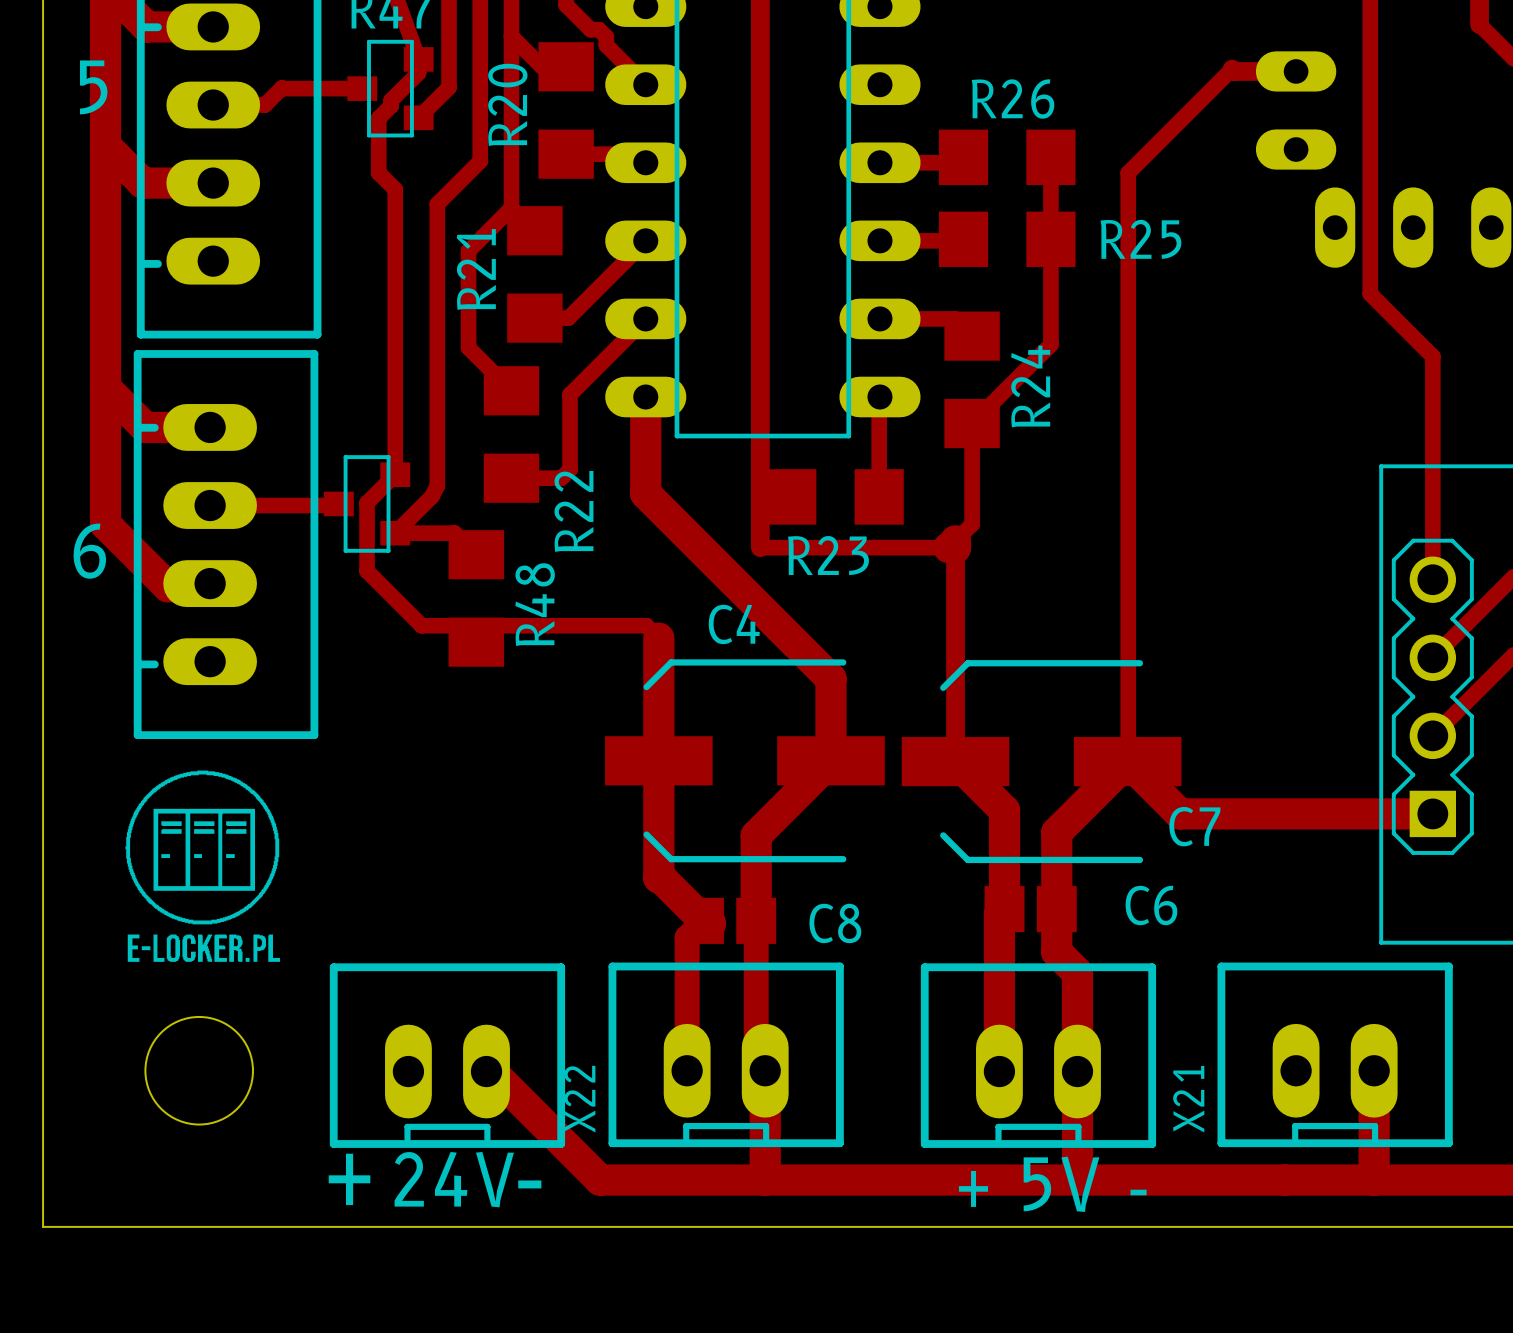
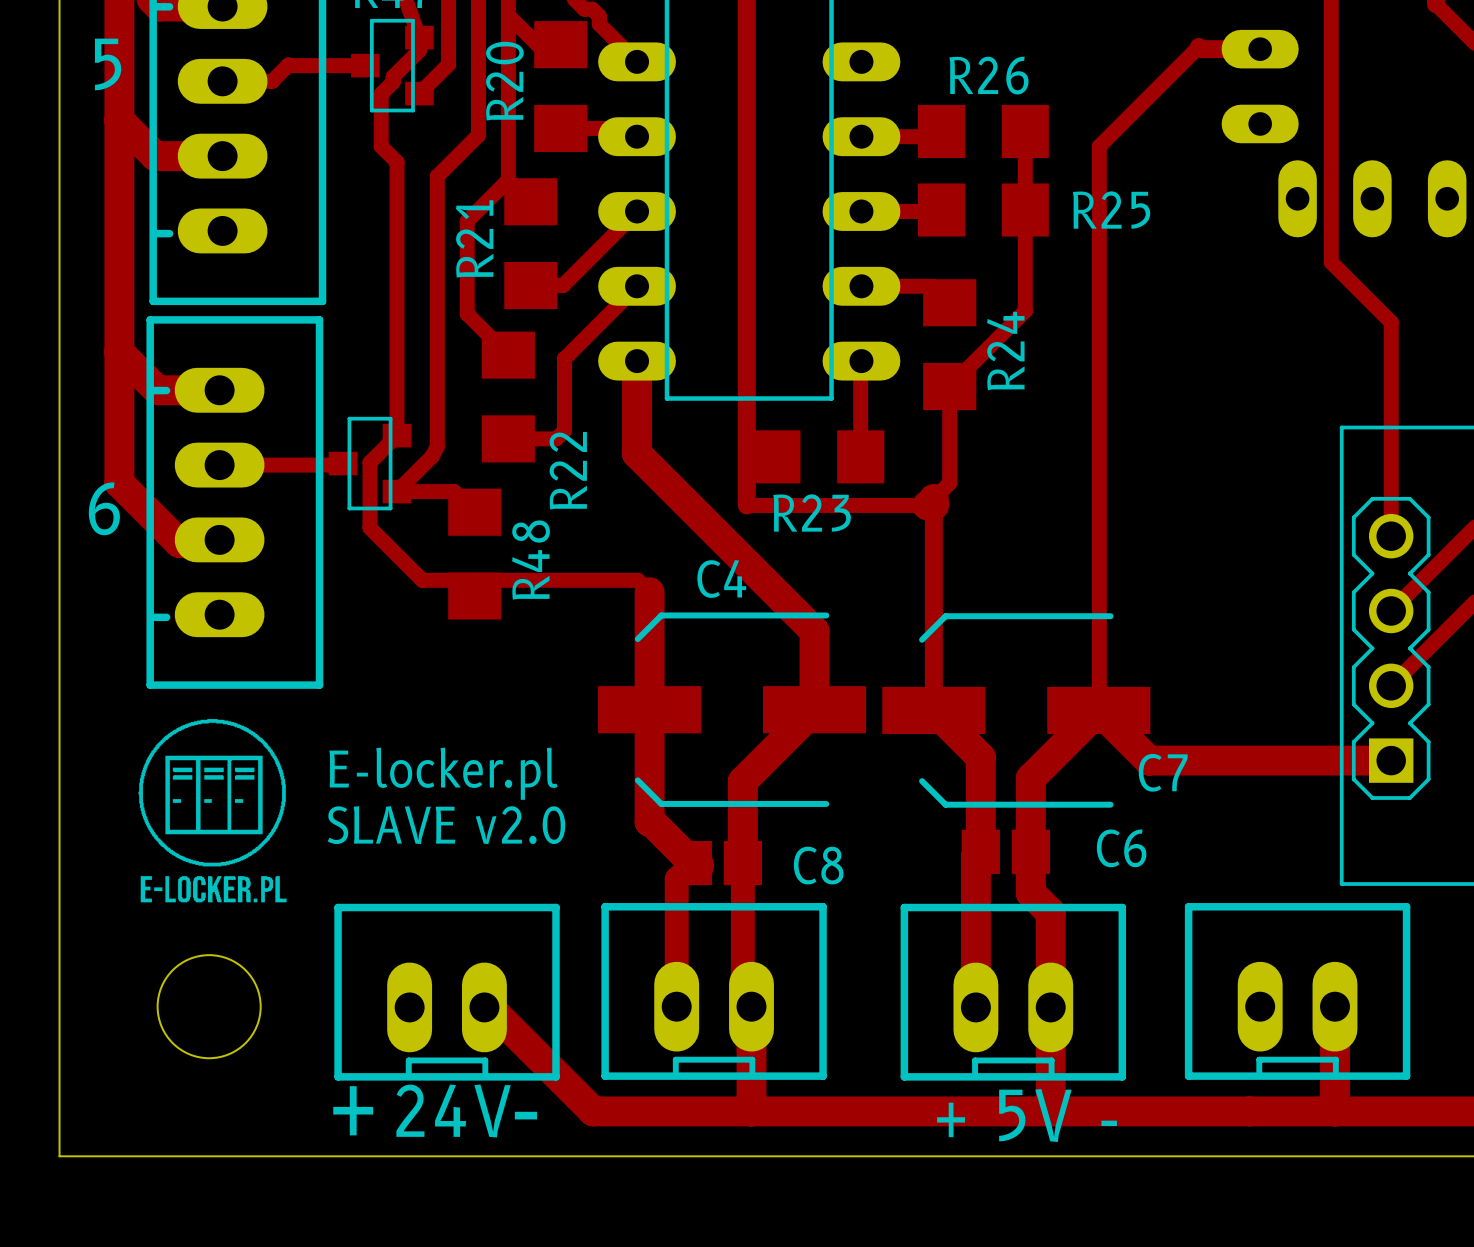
text: none -> E-locker.pl (443, 773)
text: none -> SLAVE v2.0 (446, 825)
X22 name: X22 (579, 1099) -> none
X21 name: X21 (1188, 1099) -> none

